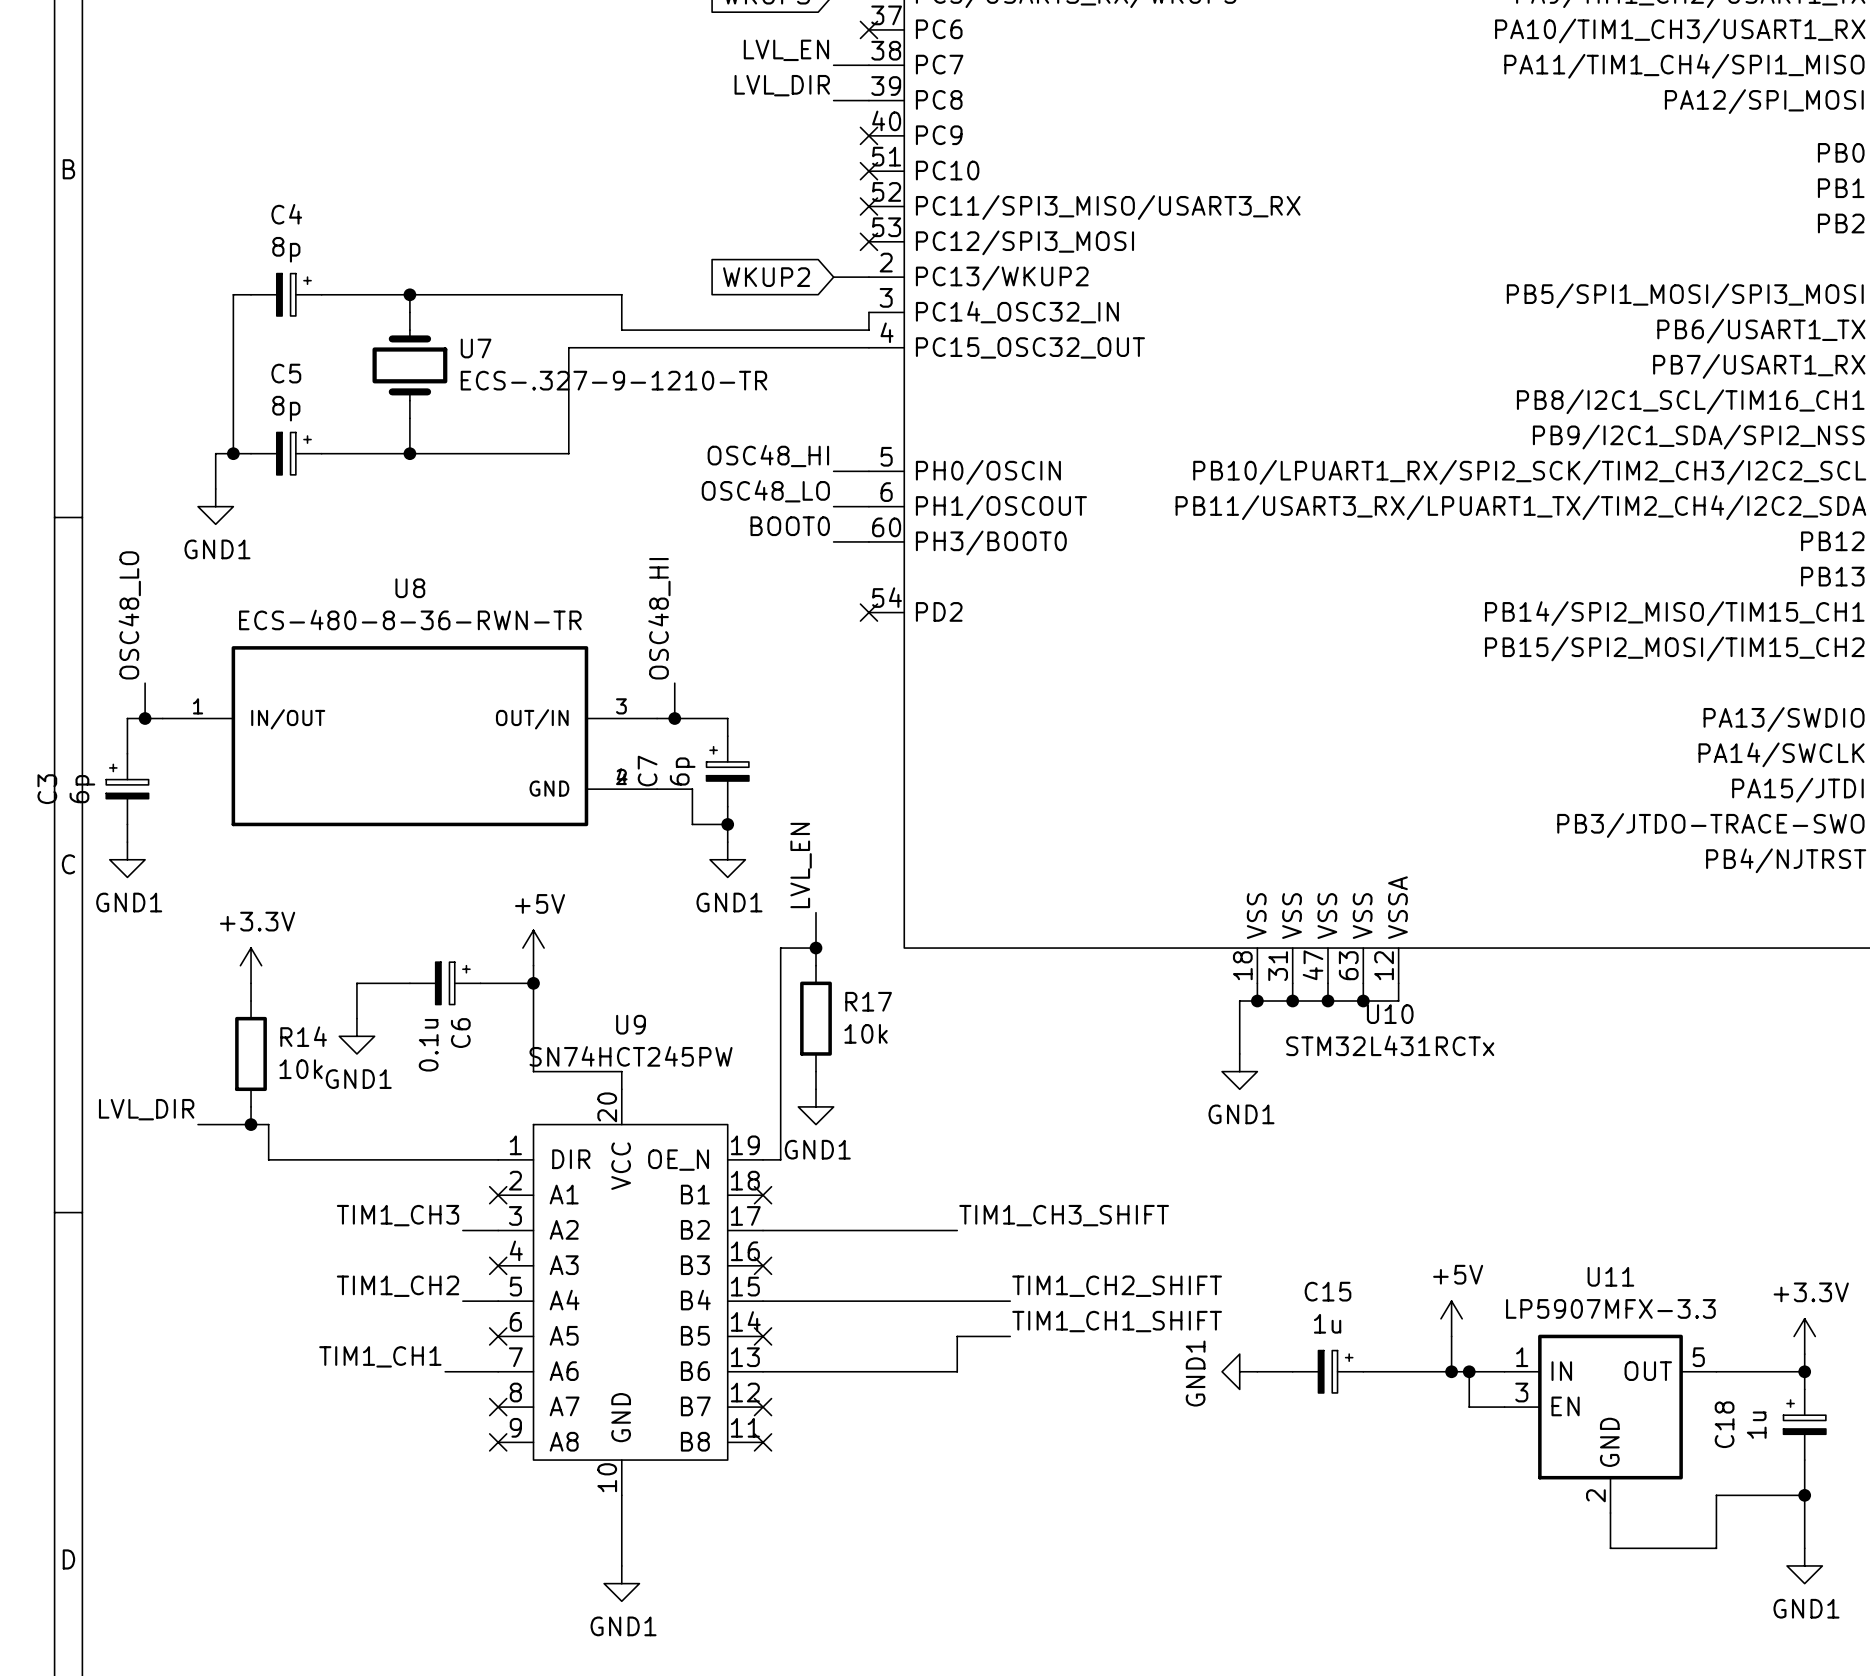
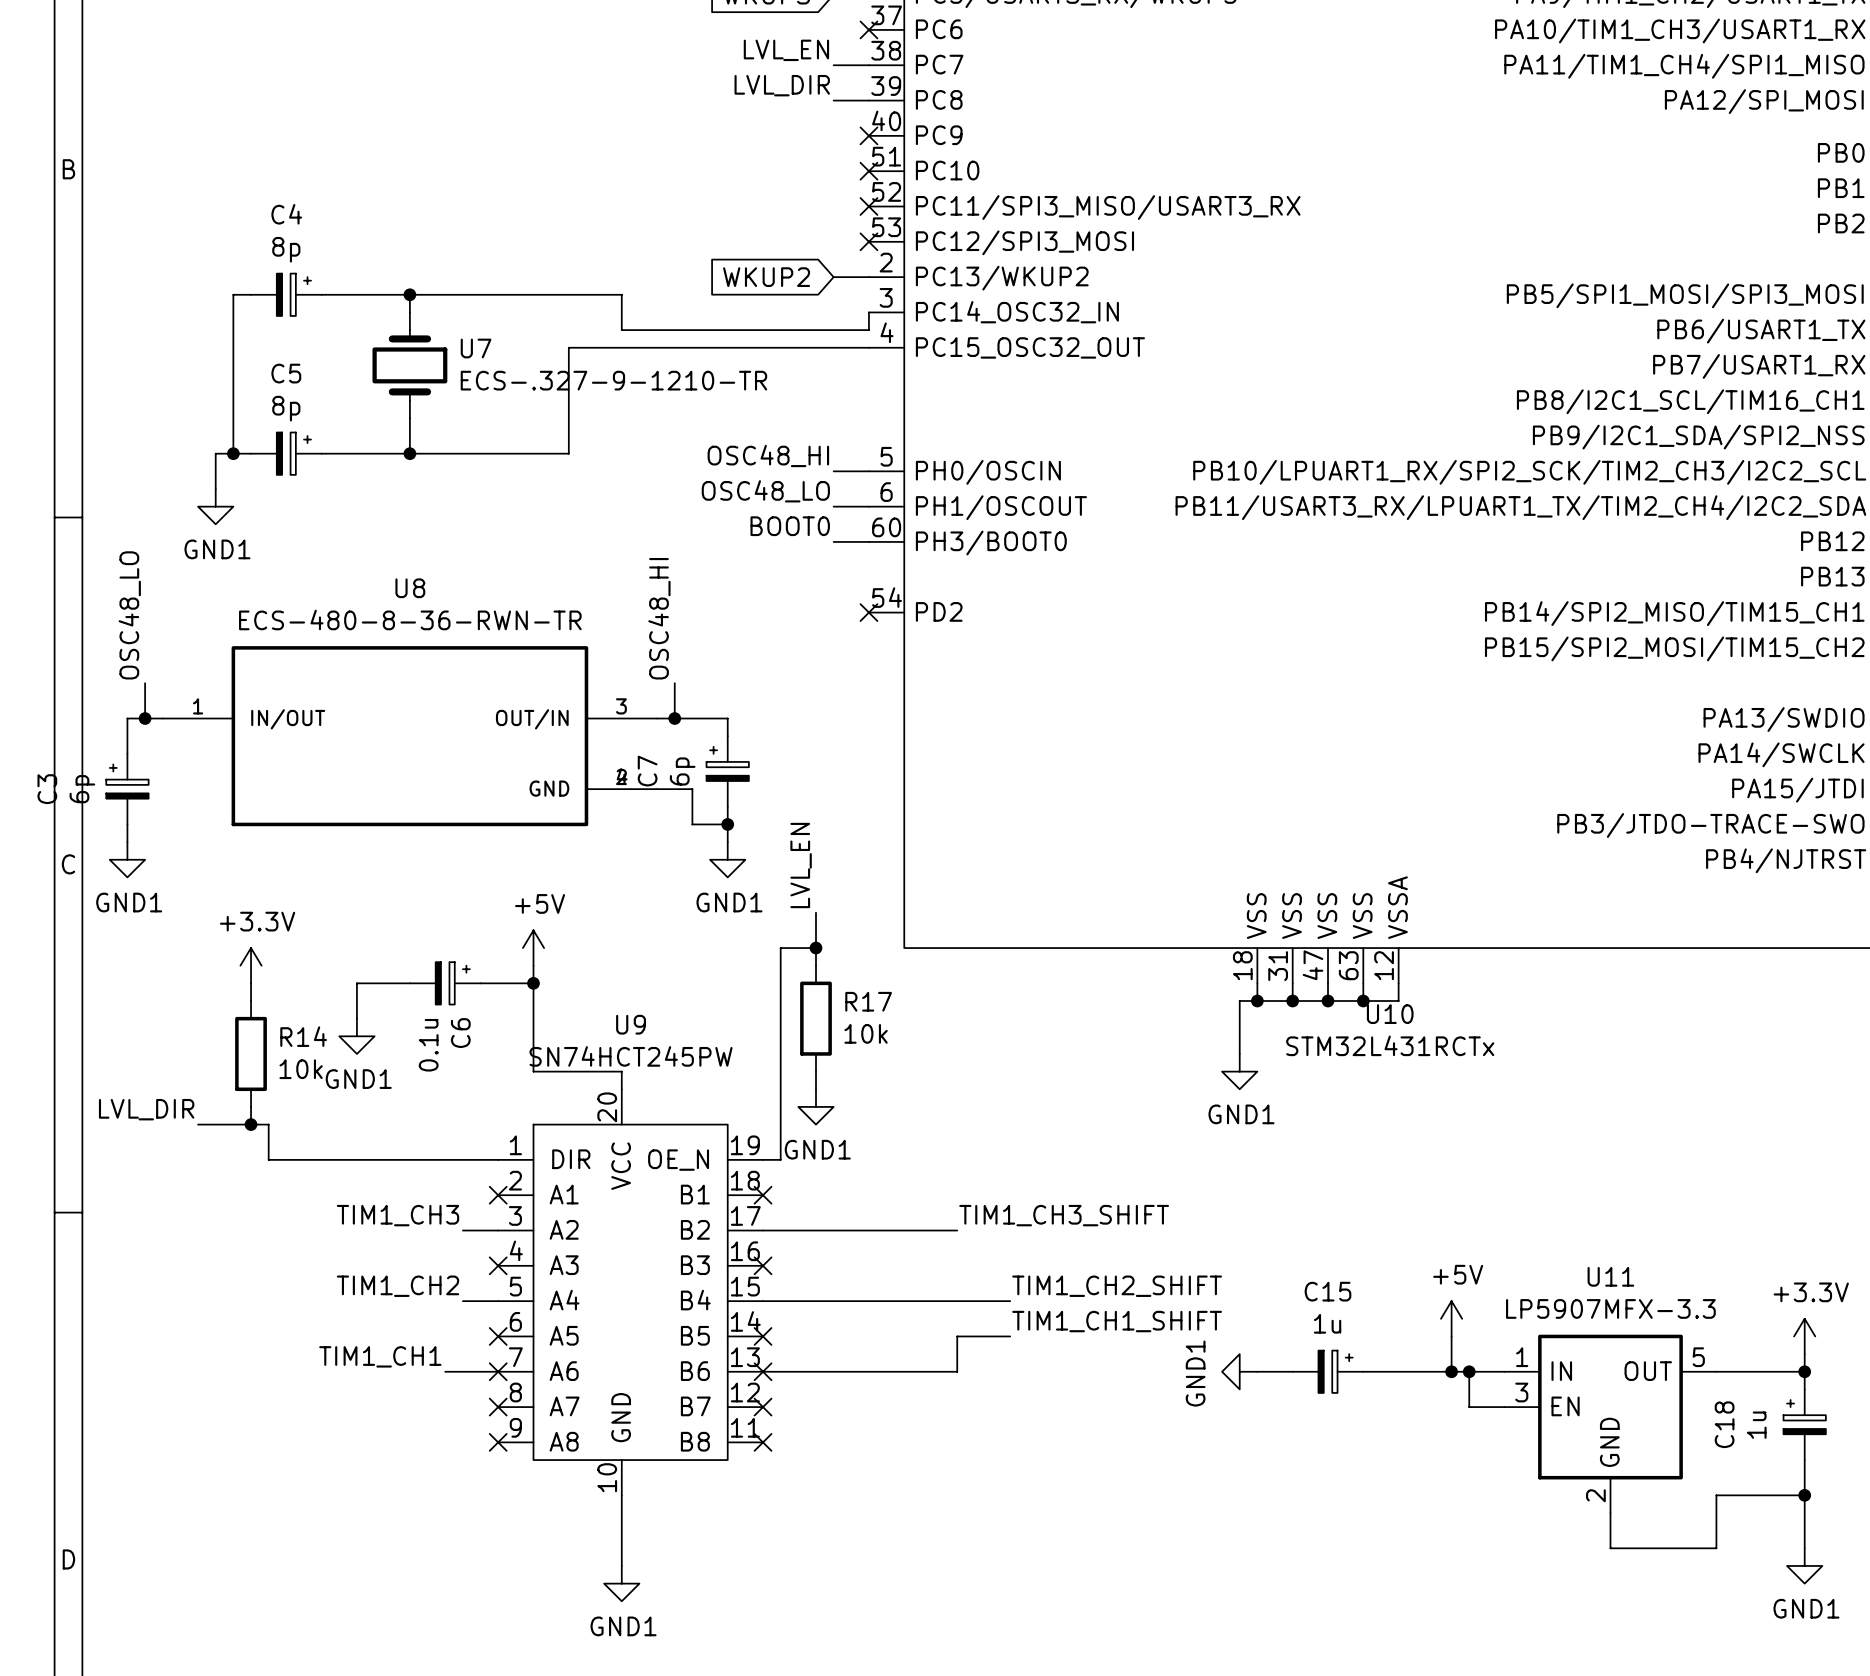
no-connect mark: none -> (498, 1371)
no-connect mark: none -> (763, 1371)

